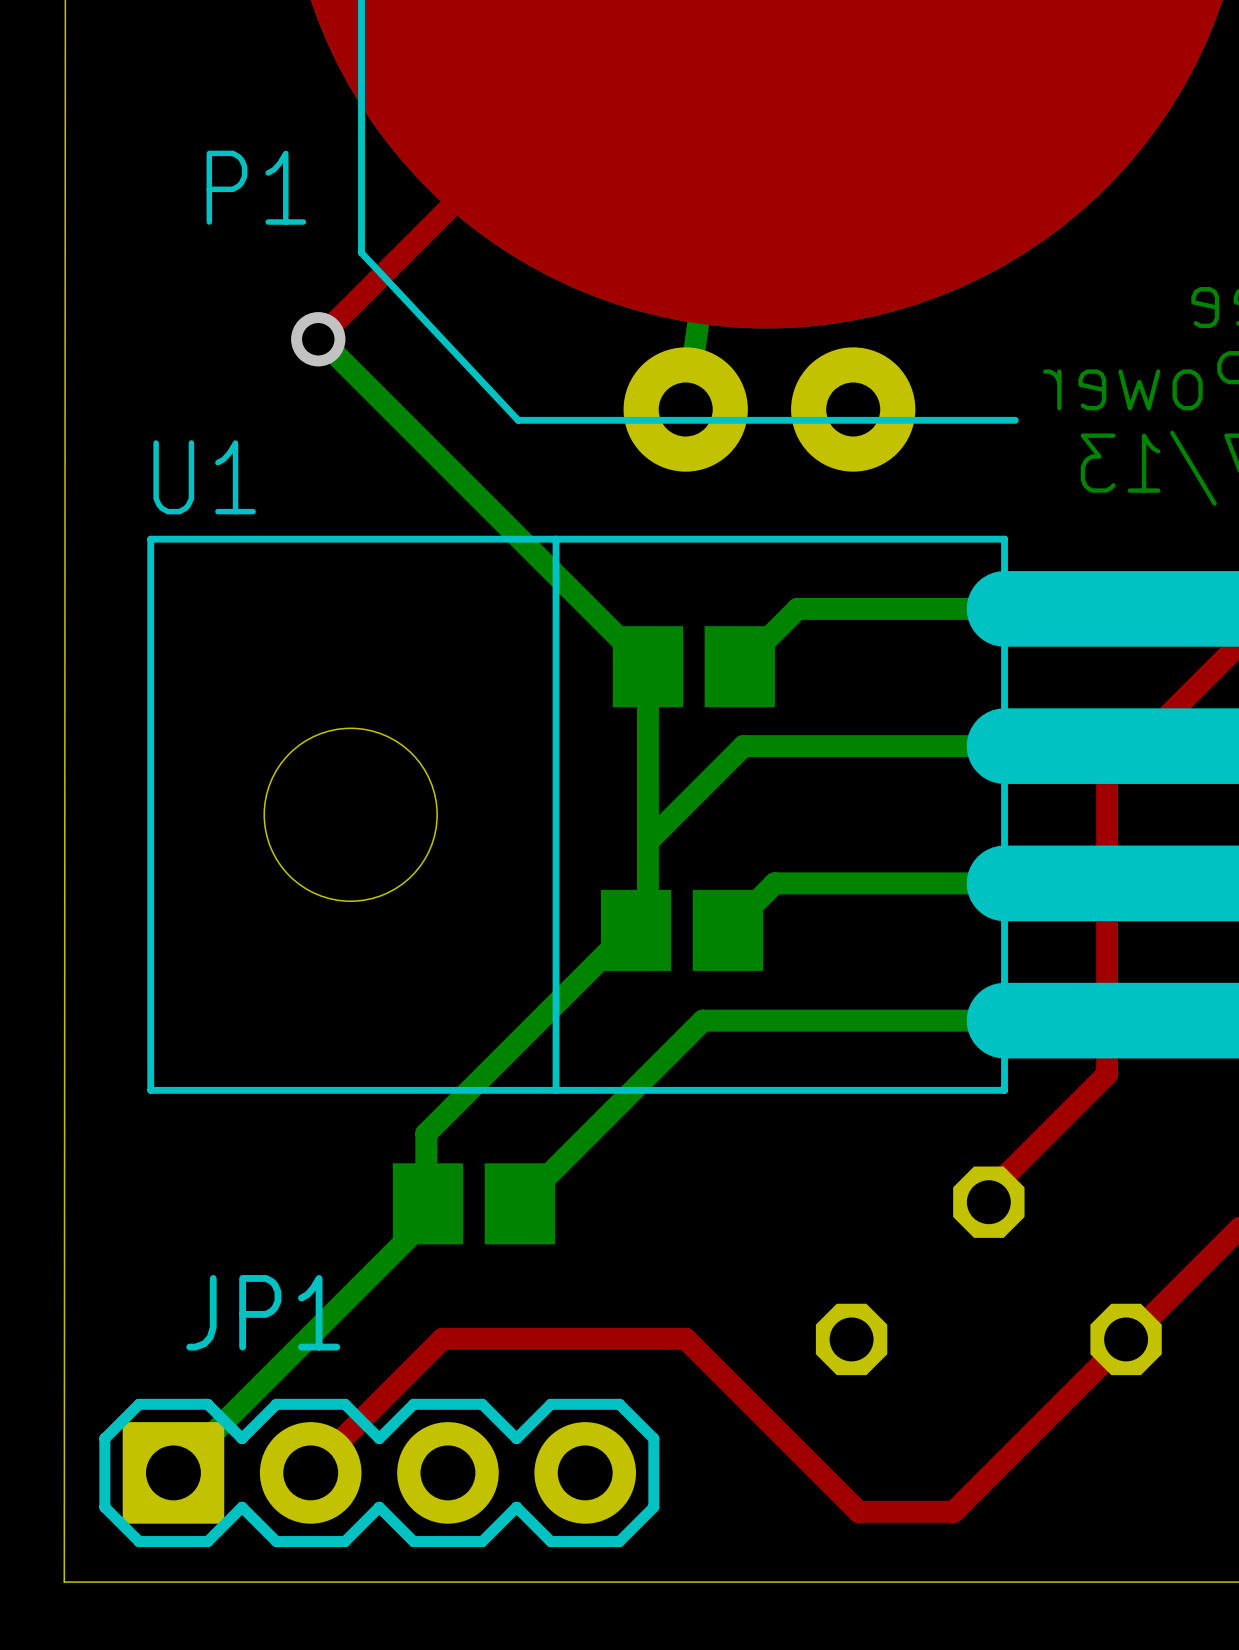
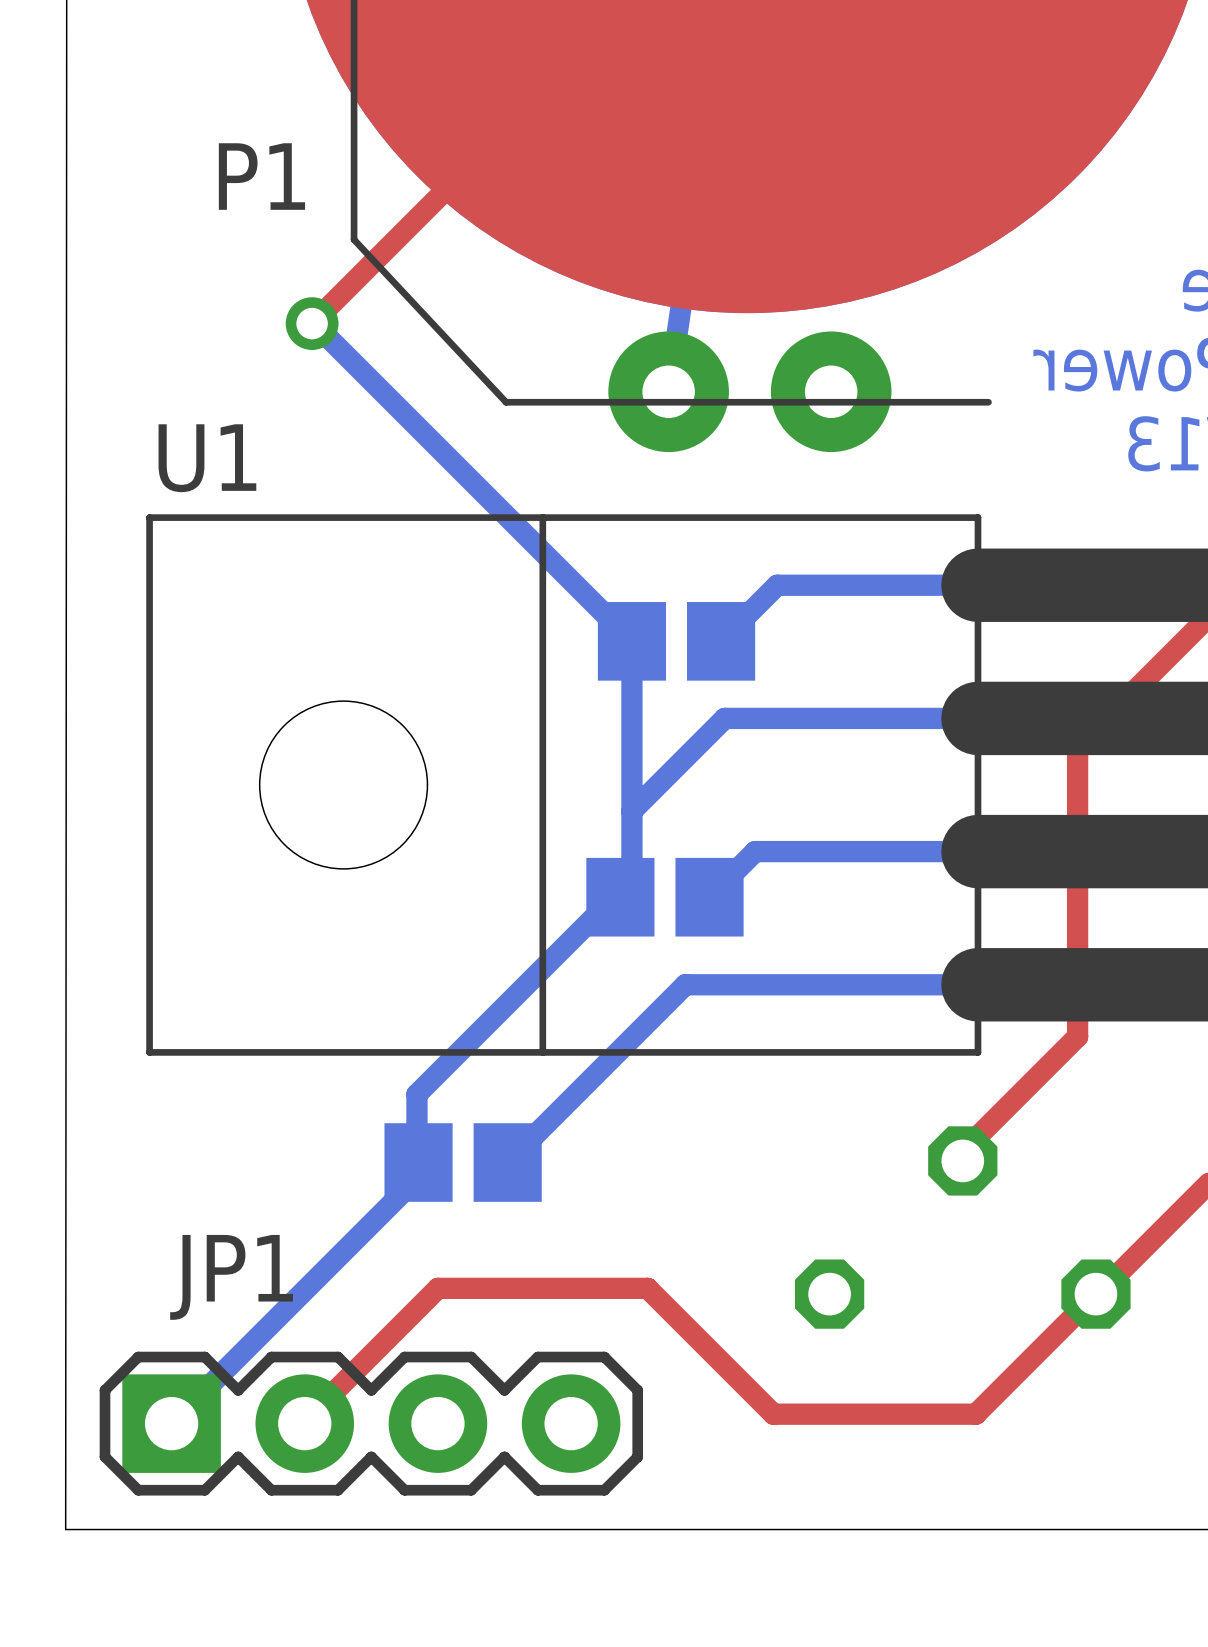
top track: (442, 1338) (685, 1338) (858, 1511) (953, 1511) (1002, 1463) -> (432, 1293) (437, 1288) (647, 1288) (773, 1414) (975, 1414)

